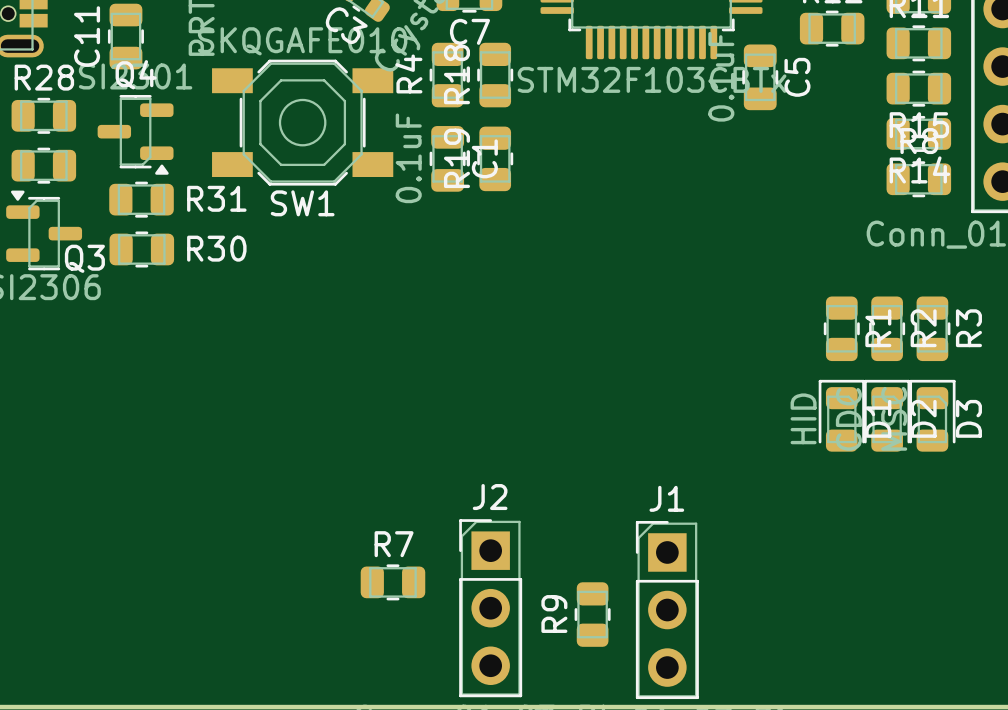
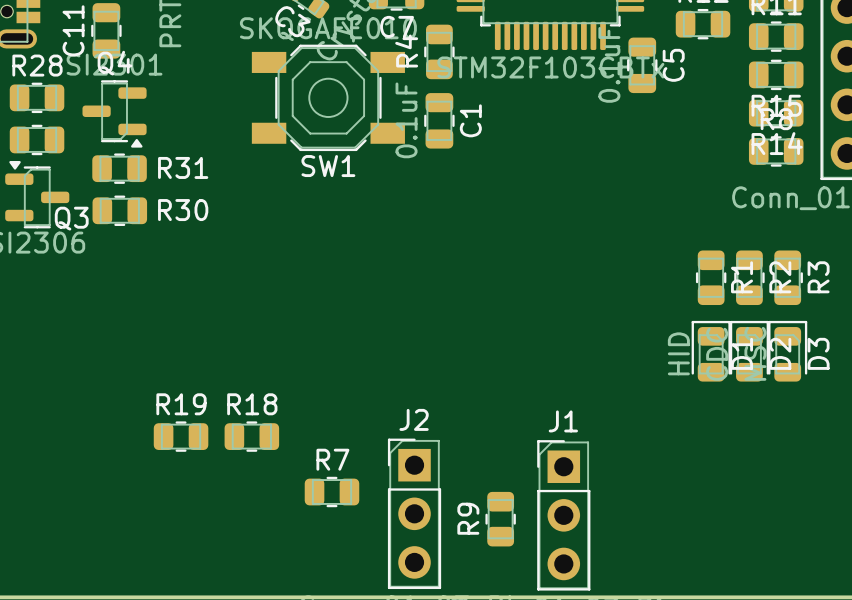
R4 position: (447, 75) -> (439, 51)
R18 rotation: 0° (495, 75) -> 90° clockwise (251, 436)
R18 position: (495, 75) -> (251, 436)
SW1 position: (302, 122) -> (328, 97)
C1 position: (447, 158) -> (439, 120)
R19 rotation: 0° (495, 158) -> 90° clockwise (181, 436)
R19 position: (495, 158) -> (181, 436)

